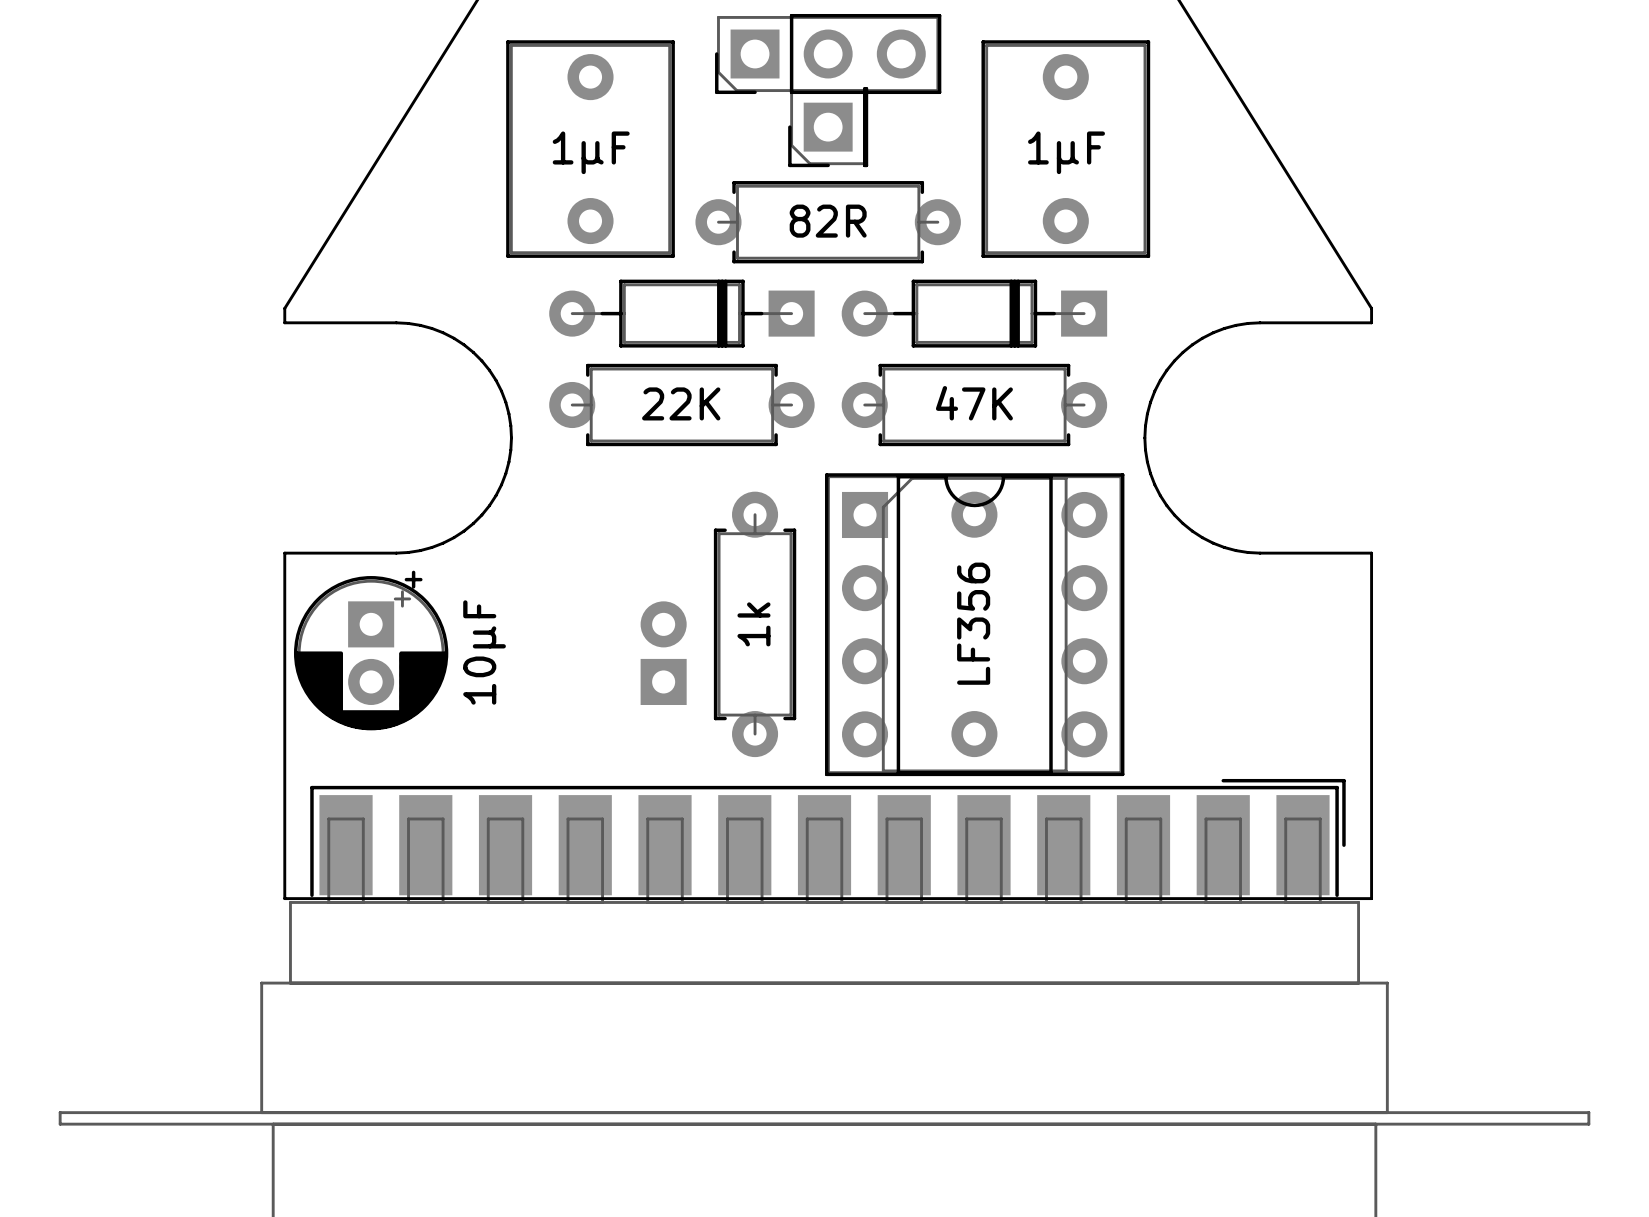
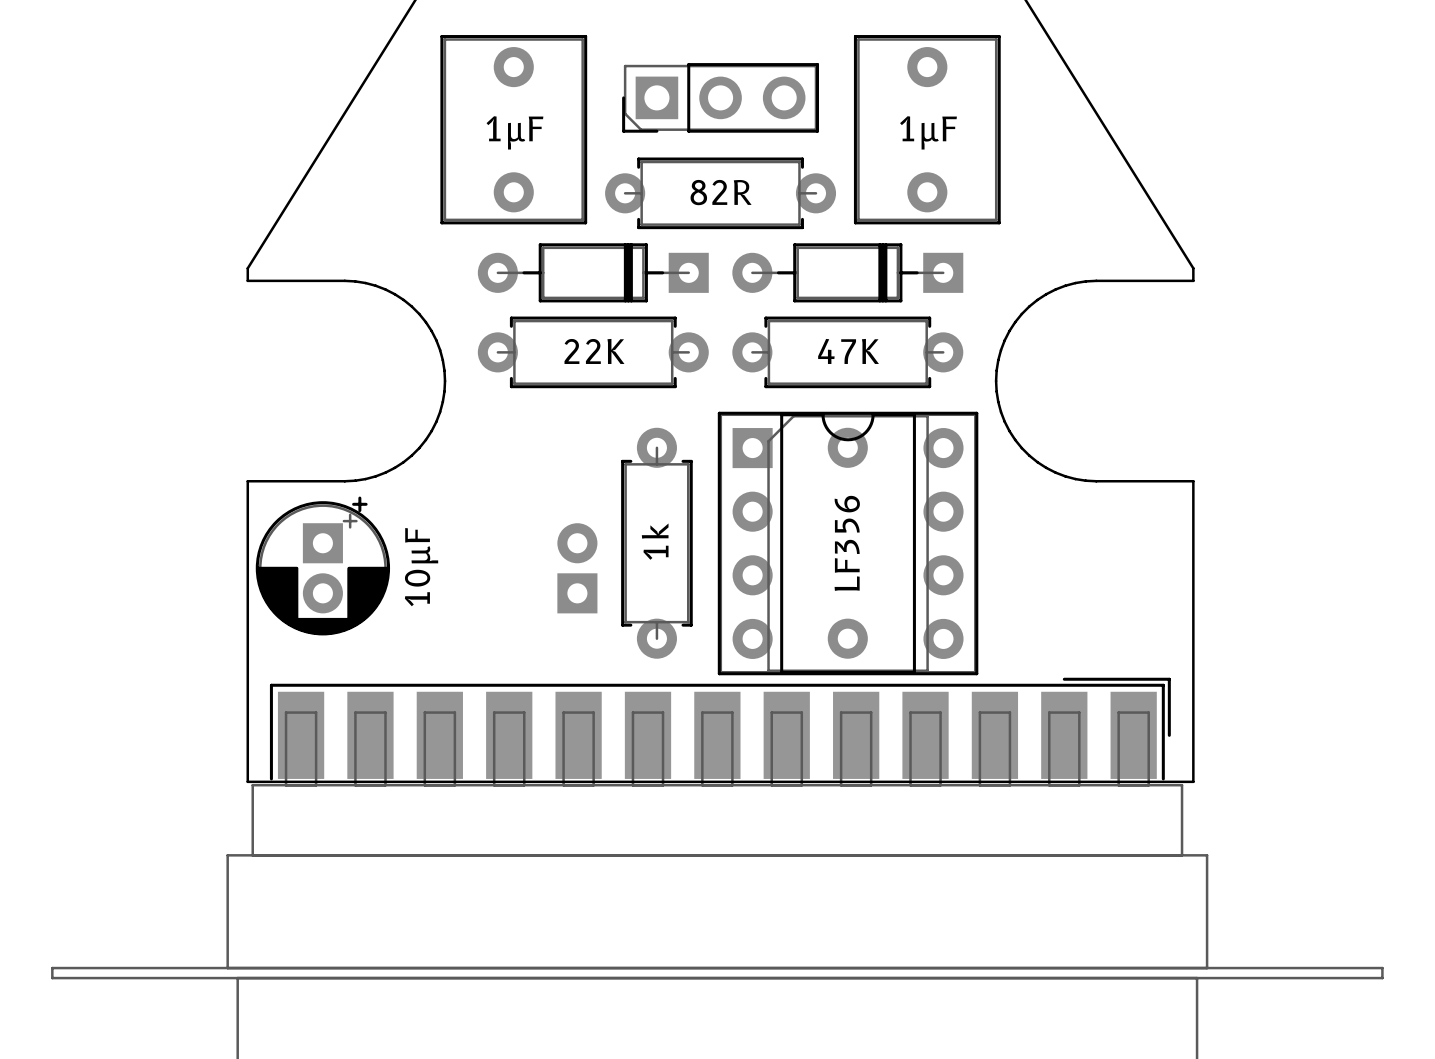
part: (828, 54) -> none
part footprint: [788, 87, 869, 168] -> [622, 63, 820, 133]

